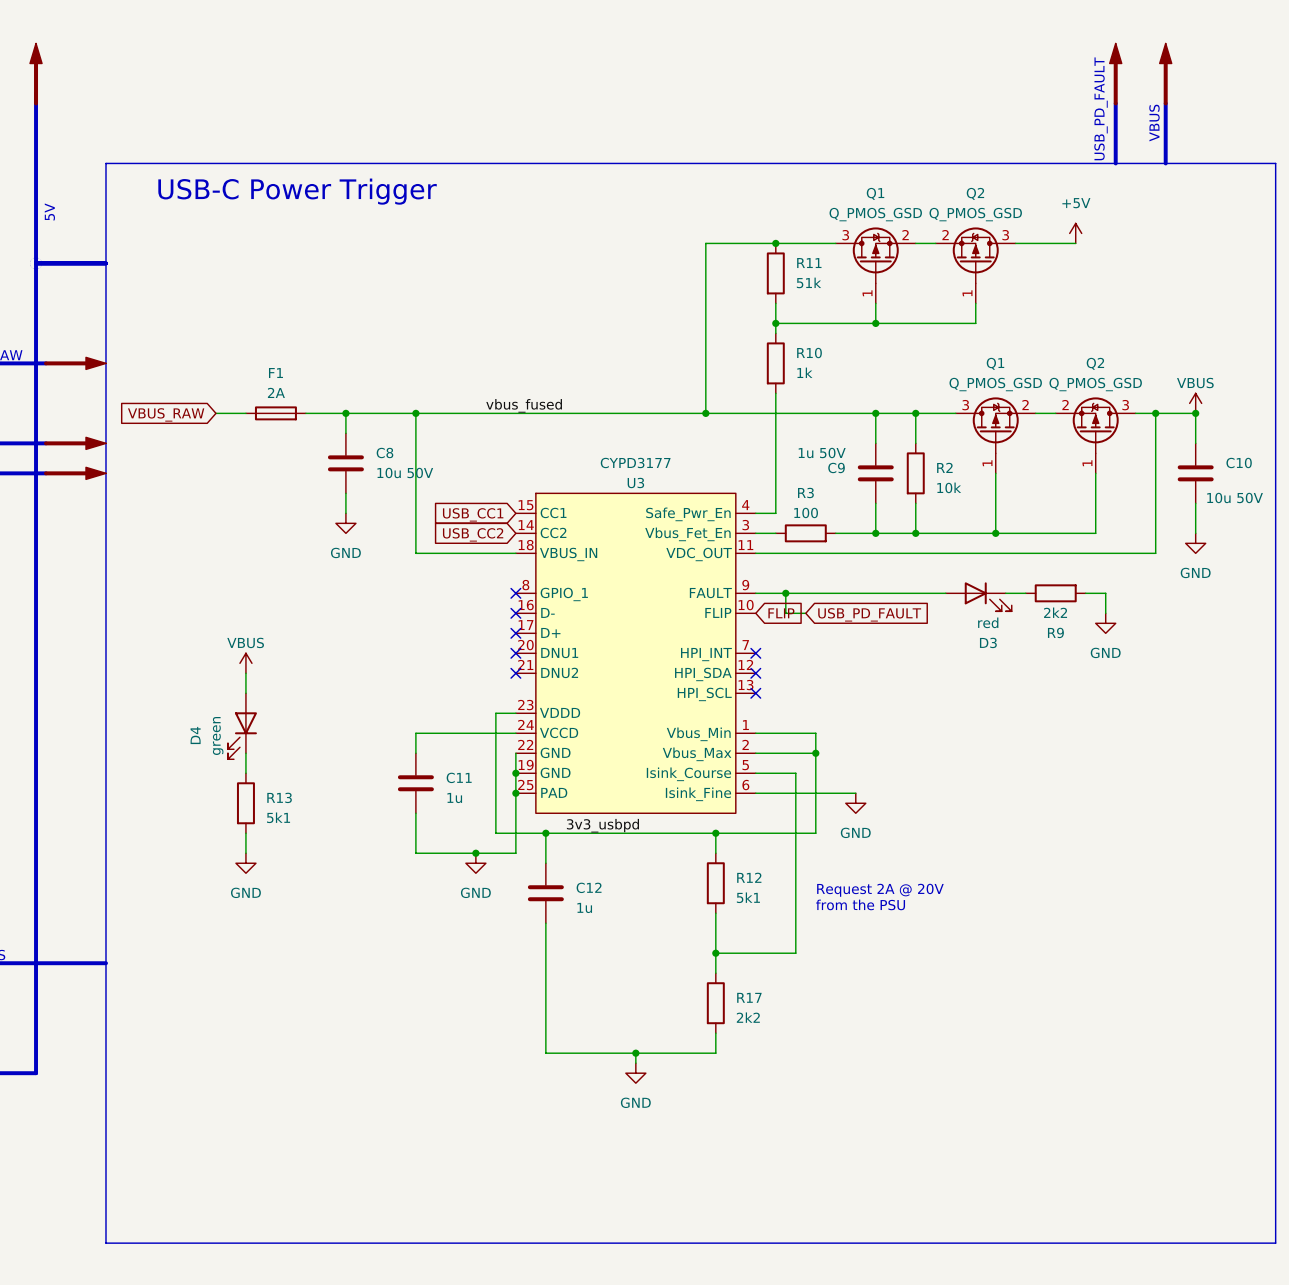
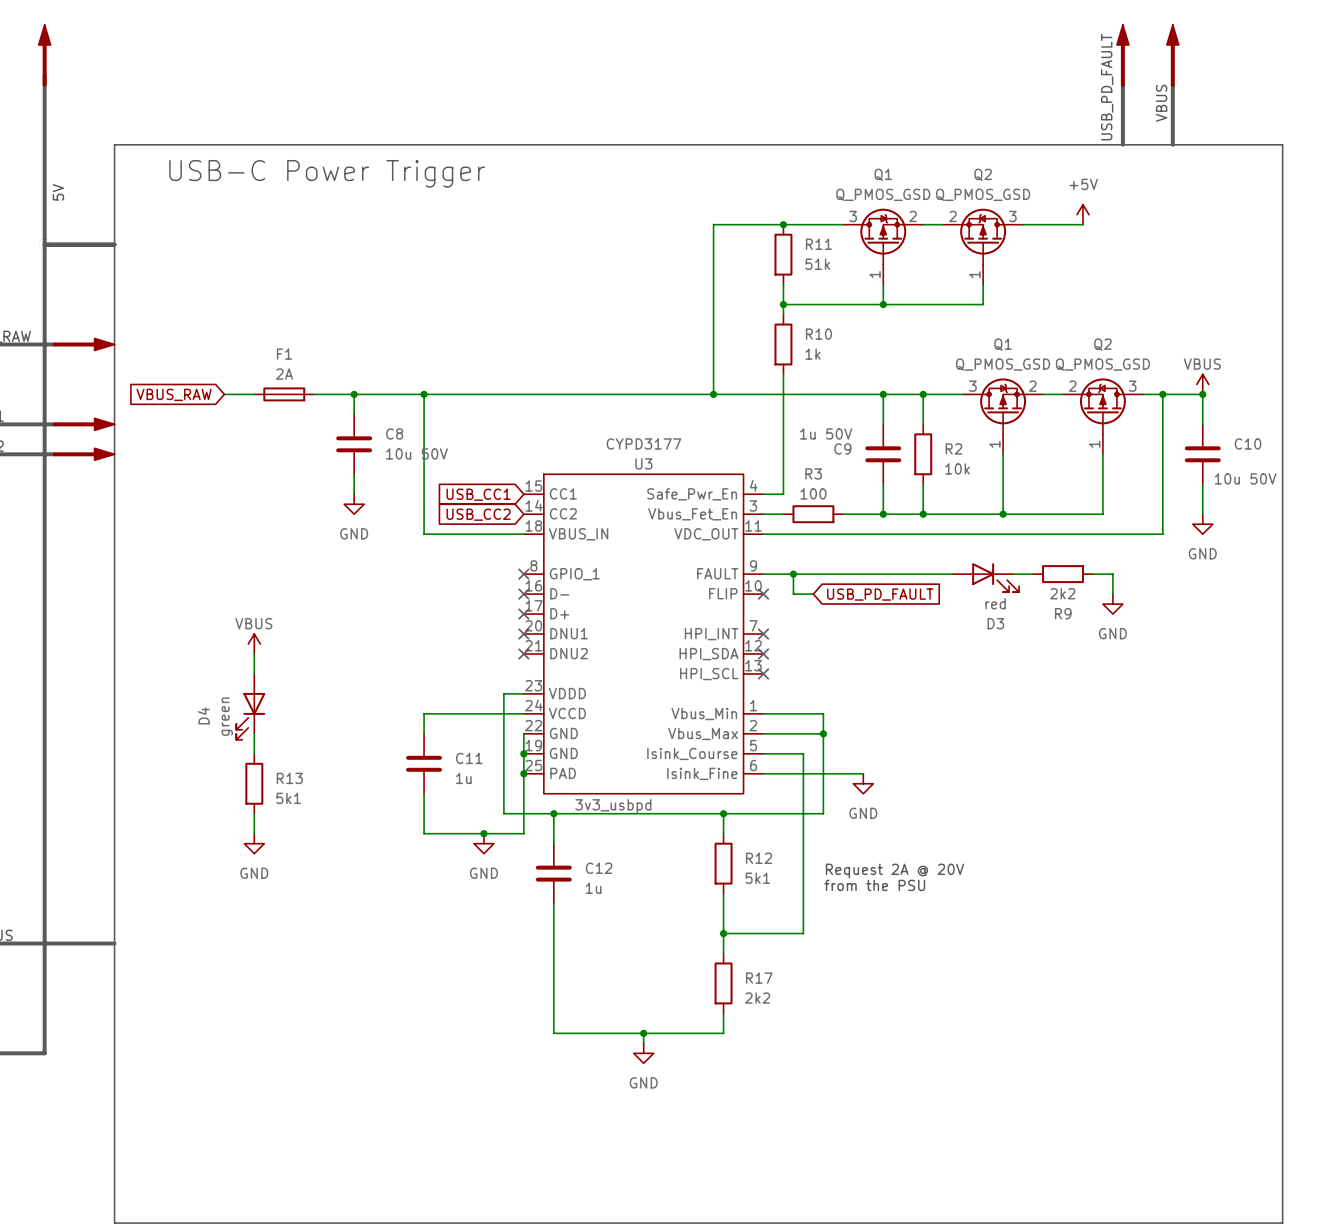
label: vbus_fused (524, 405) -> none
no-connect mark: none -> (763, 594)
global label: FLIP (781, 613) -> none

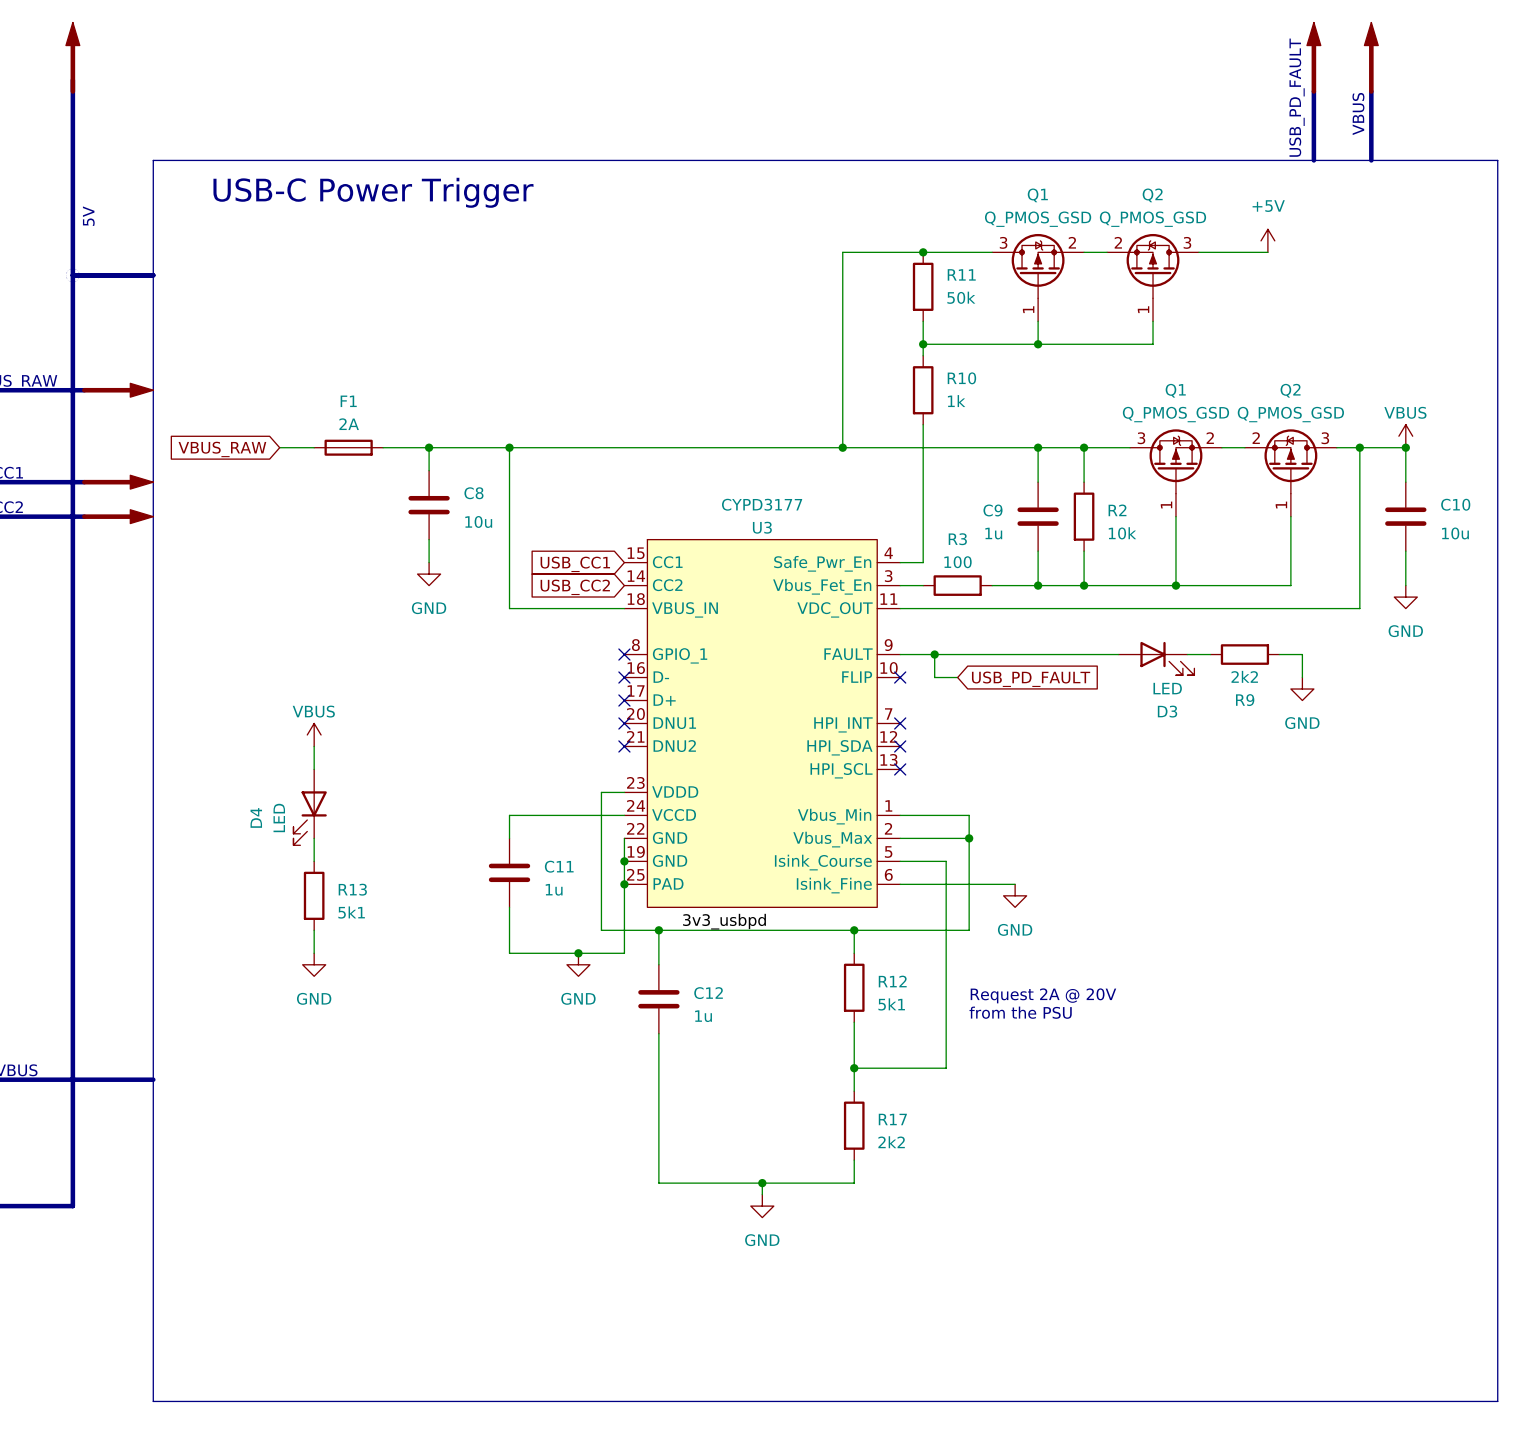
R11 value: 51k (817, 264) -> 50k (961, 297)
C9 value: 1u 50V (826, 433) -> 1u (993, 533)
C8 value: 10u 50V (416, 453) -> 10u (478, 521)
C10 value: 10u 50V (1245, 478) -> 10u (1455, 533)
D3 value: red (995, 603) -> LED (1167, 688)
D4 value: green (227, 716) -> LED (279, 817)

